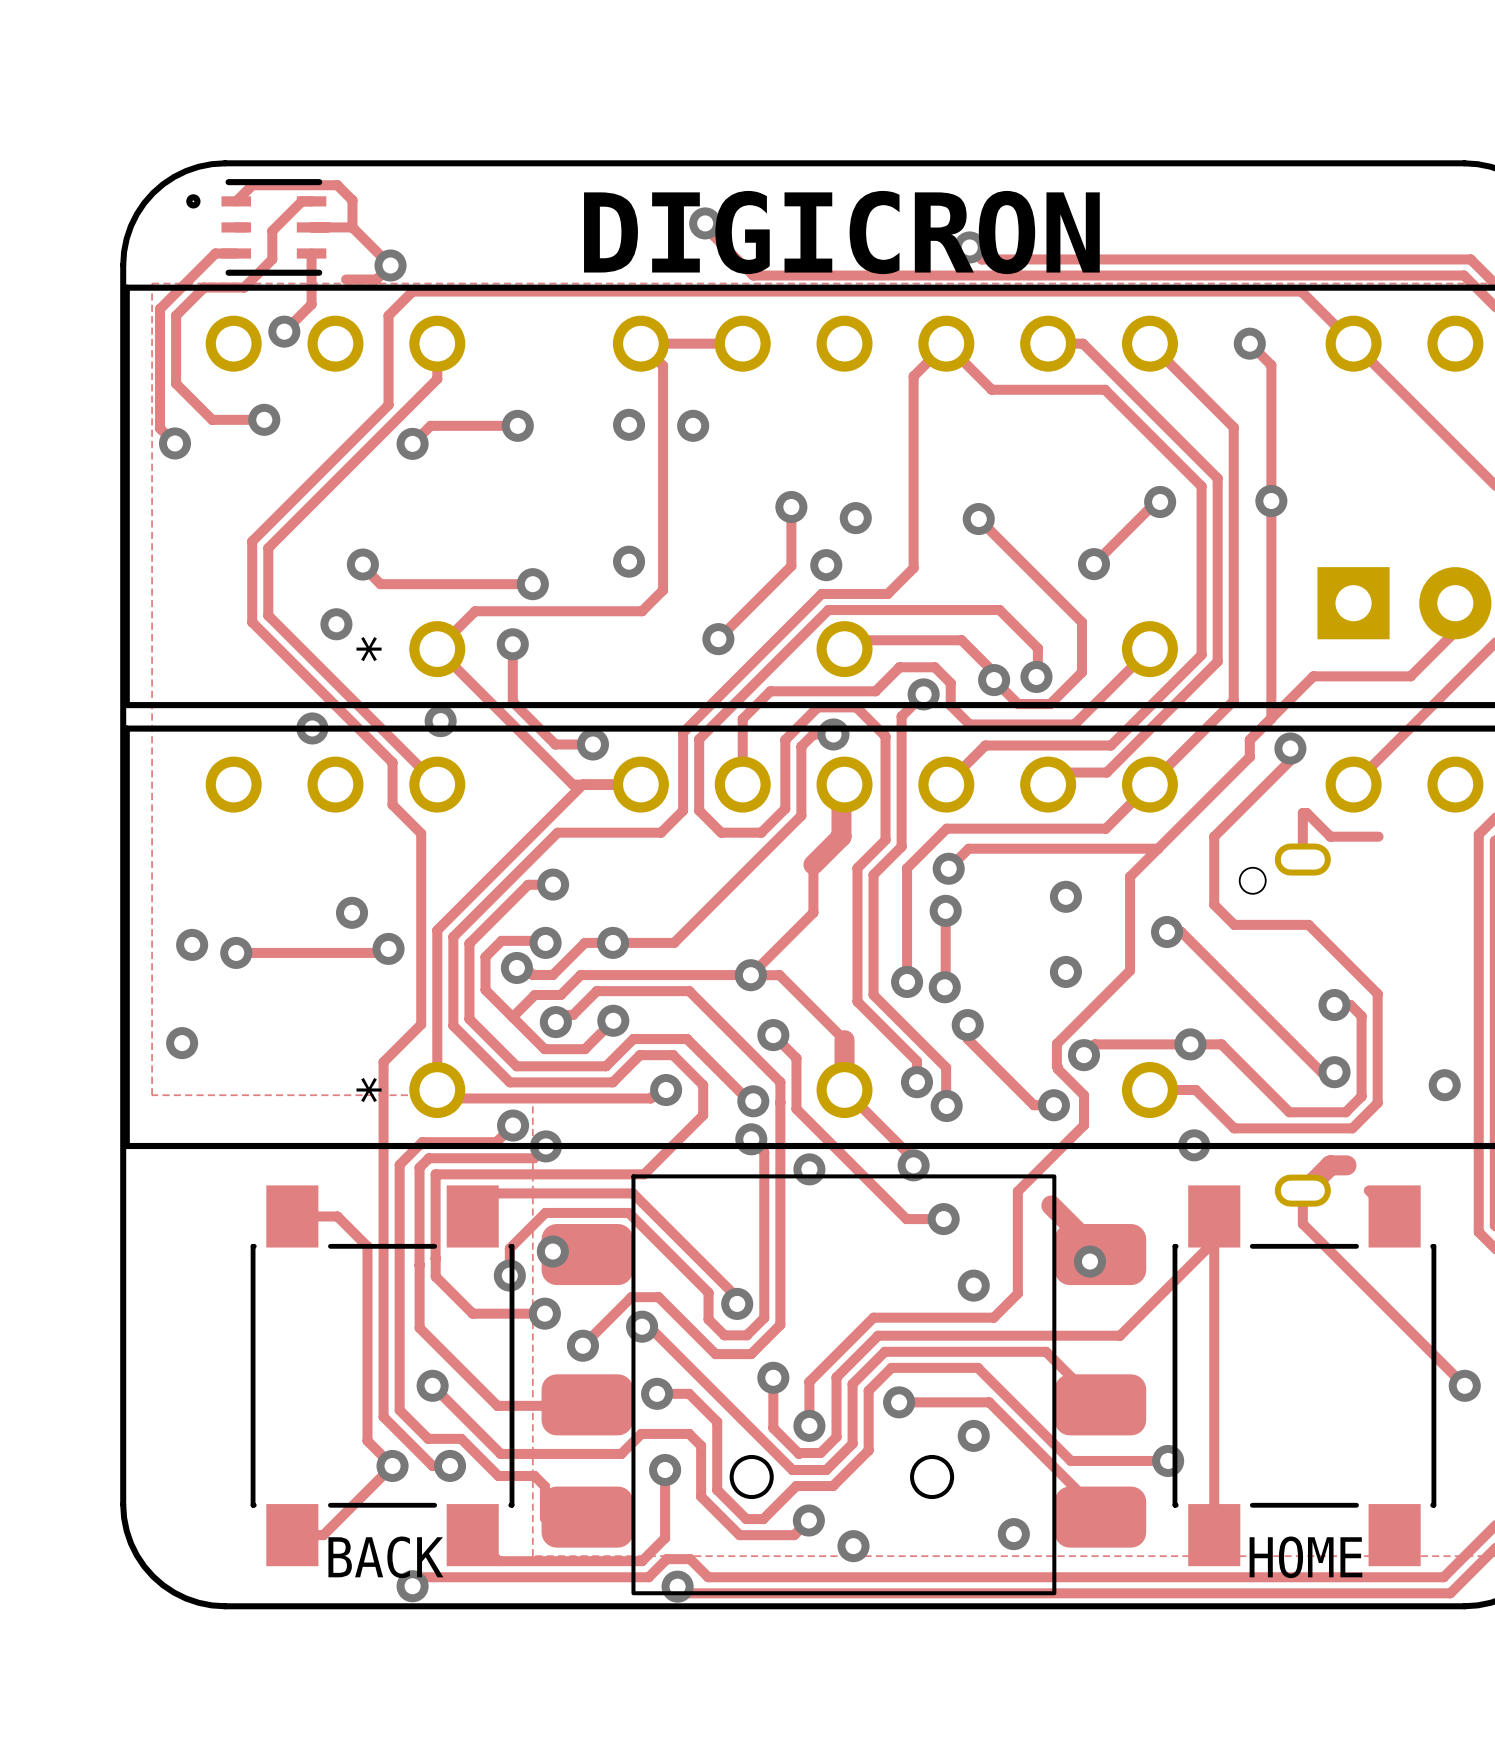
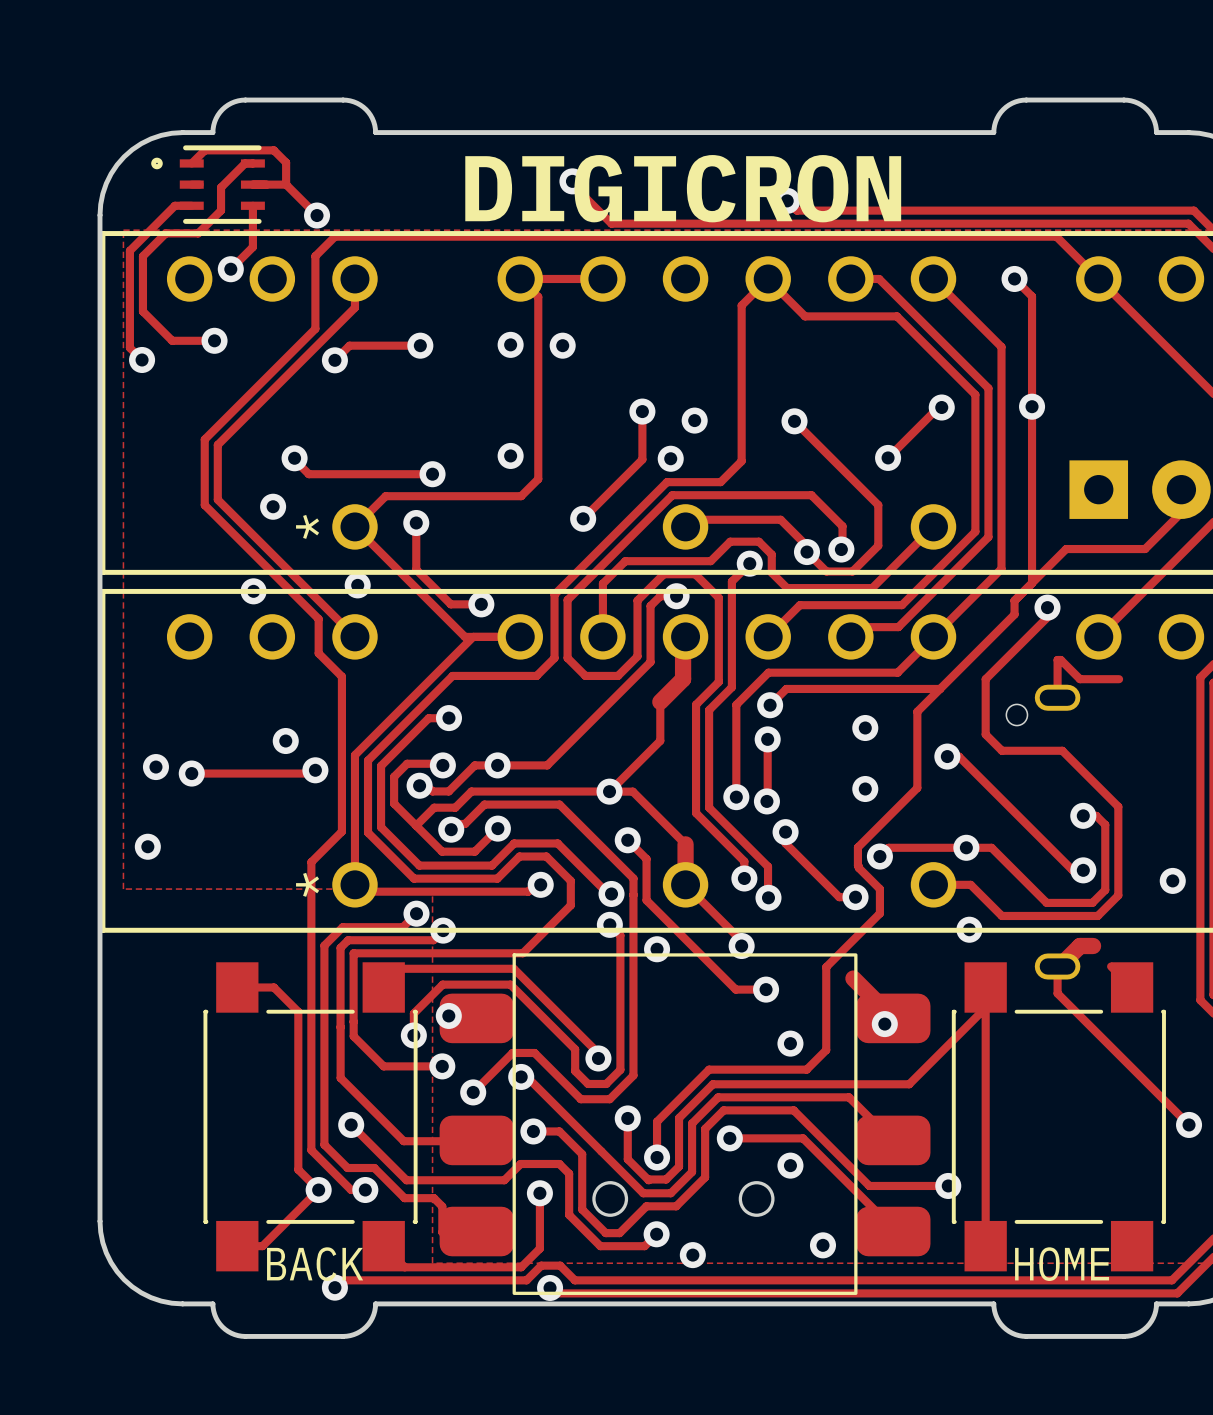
board edge: (262, 163) (462, 163) -> (212, 132) (216, 118) (222, 109) (231, 103) (245, 100) (350, 100) (360, 105) (368, 112) (373, 121) (375, 132)
board edge: (1224, 163) (1424, 163) -> (993, 132) (997, 118) (1003, 109) (1012, 103) (1026, 100) (1131, 100) (1141, 105) (1149, 112) (1154, 121) (1156, 132)
track: (390, 265) (376, 279) (346, 279) -> none
board edge: (262, 1606) (462, 1606) -> (212, 1303) (214, 1314) (222, 1326) (234, 1334) (245, 1336) (350, 1335) (360, 1331) (368, 1324) (373, 1314) (375, 1303)
board edge: (1224, 1606) (1424, 1606) -> (993, 1303) (995, 1314) (1003, 1326) (1012, 1333) (1026, 1336) (1131, 1335) (1141, 1331) (1149, 1324) (1154, 1314) (1156, 1303)

